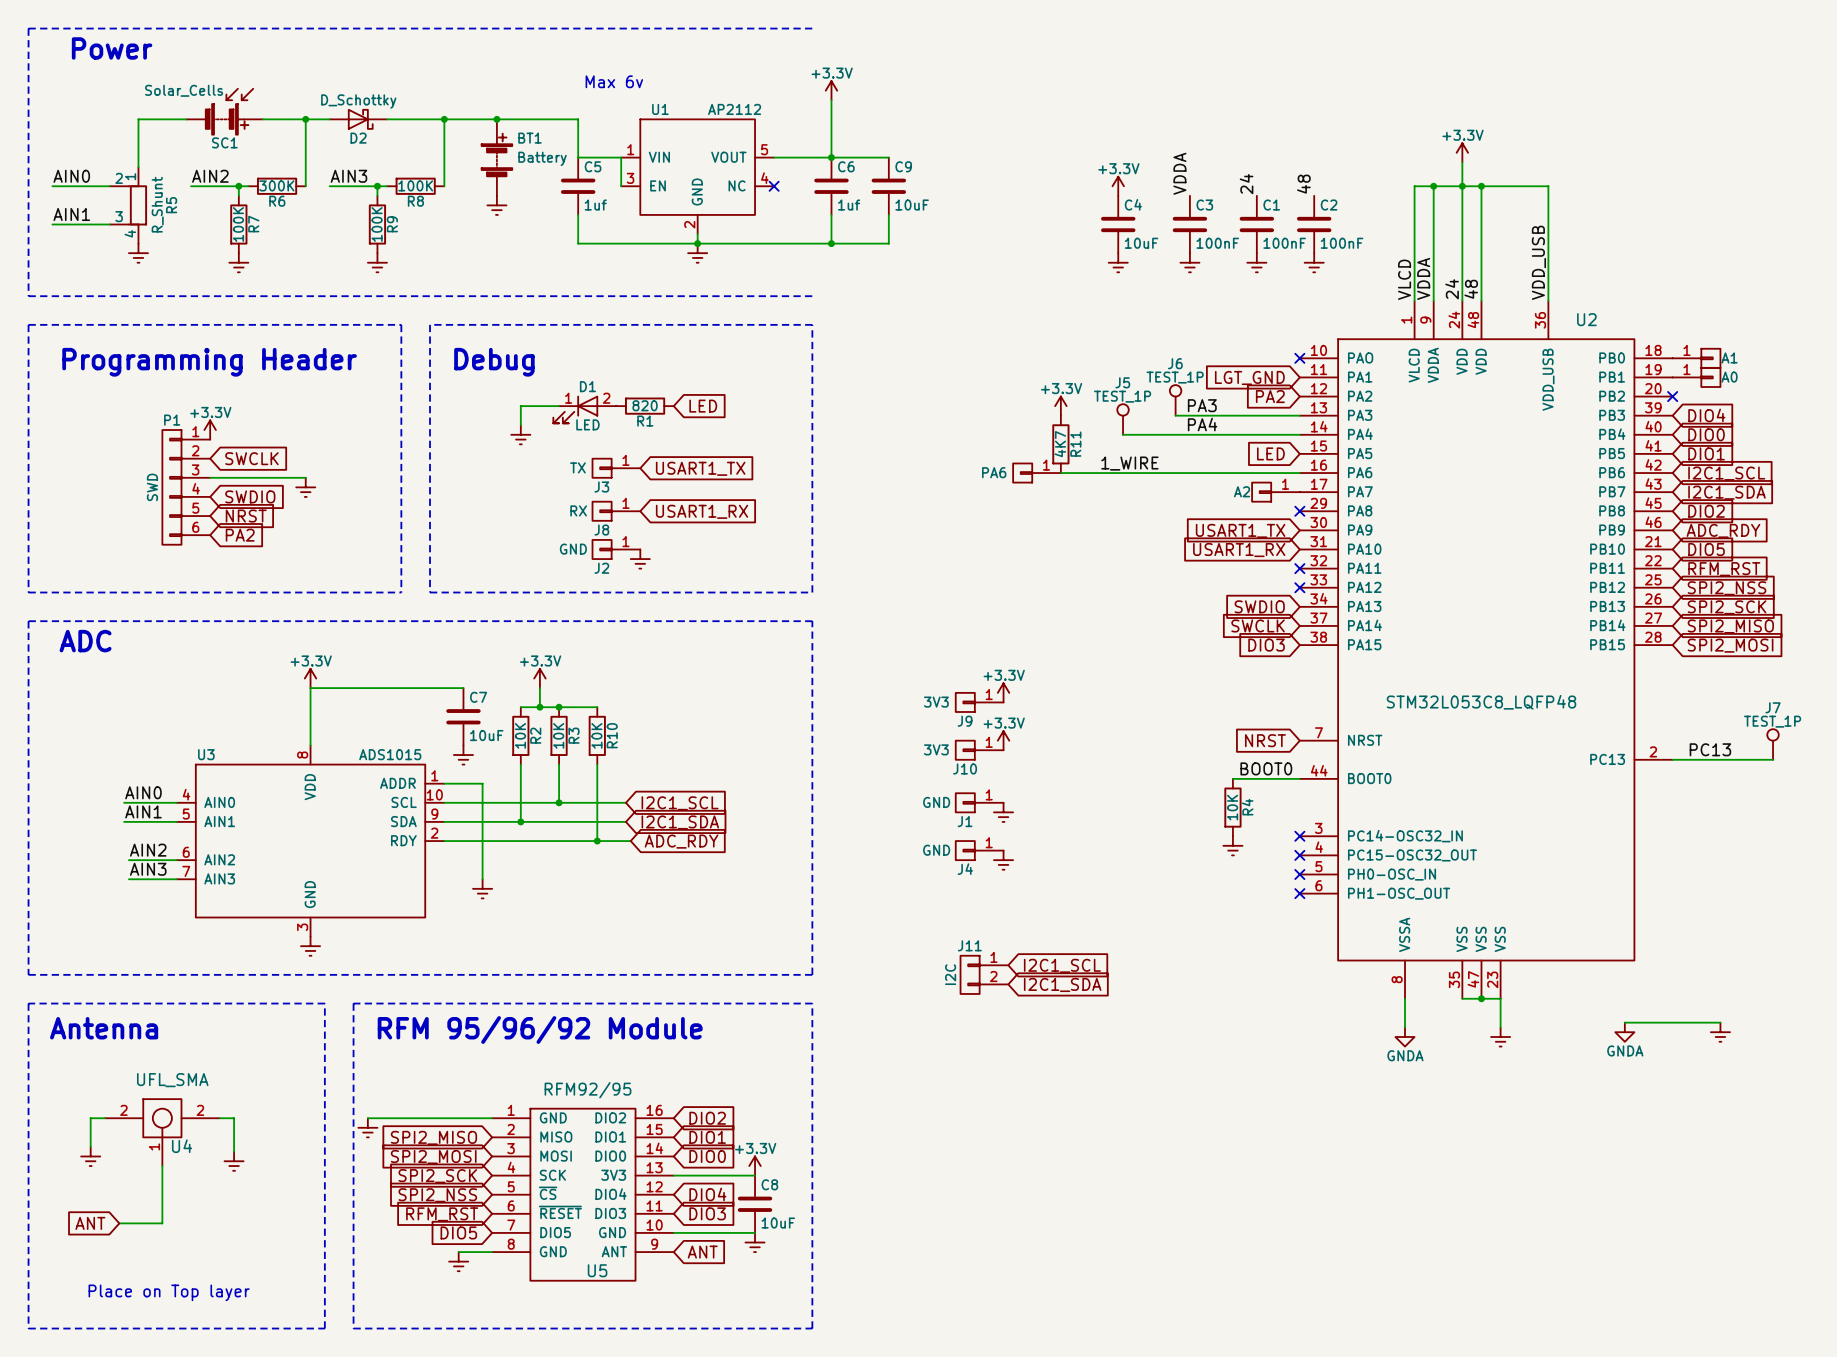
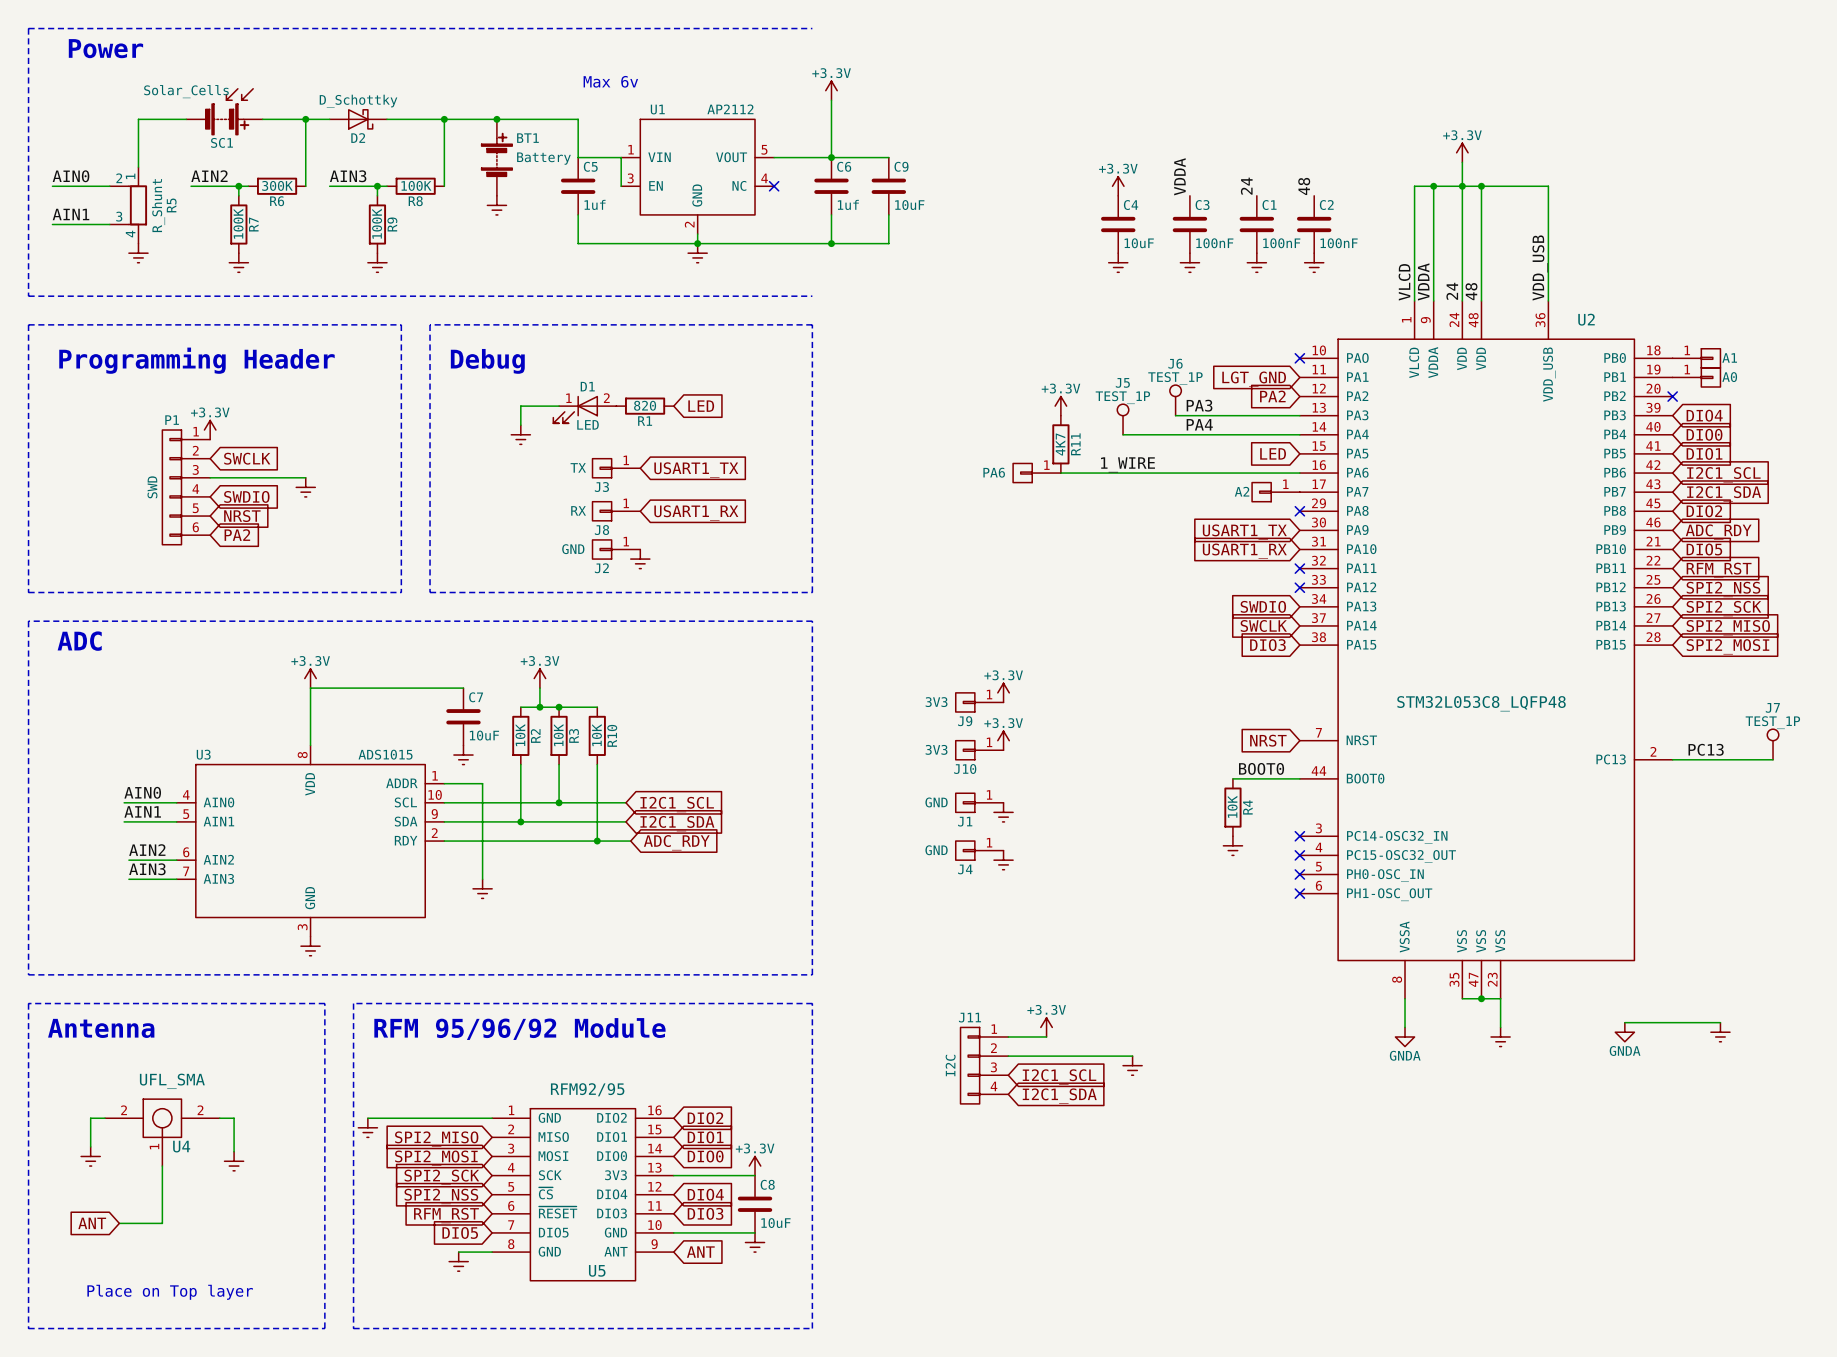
J11 name position: J11 (969, 945) -> J11 (969, 1017)
J11 symbol: [960, 955, 1009, 994] -> [960, 1027, 1009, 1104]
global label position: I2C1_SCL (1062, 965) -> I2C1_SCL (1059, 1076)
global label position: I2C1_SDA (1062, 984) -> I2C1_SDA (1059, 1096)
power symbol: none -> +3.3V (1046, 1027)
wire: none -> (1008, 1036) (1046, 1036)
wire: none -> (1008, 1056) (1132, 1056)
power symbol: none -> (1132, 1065)

